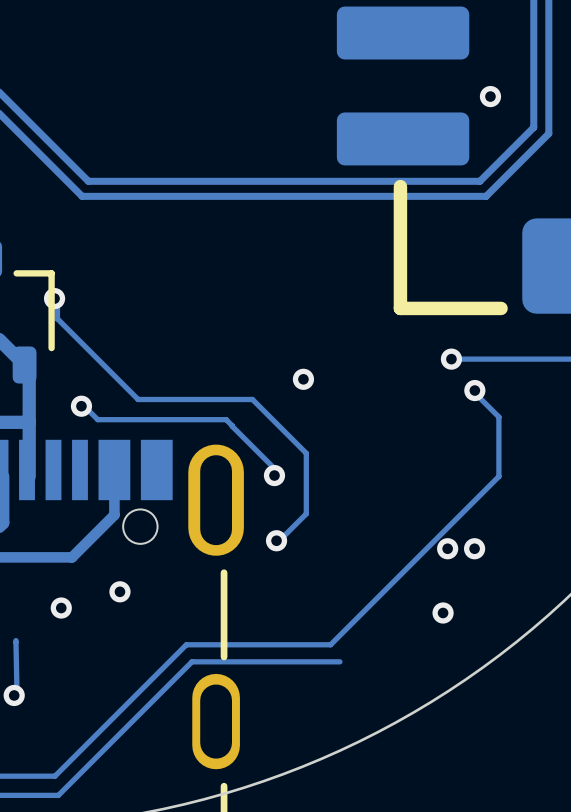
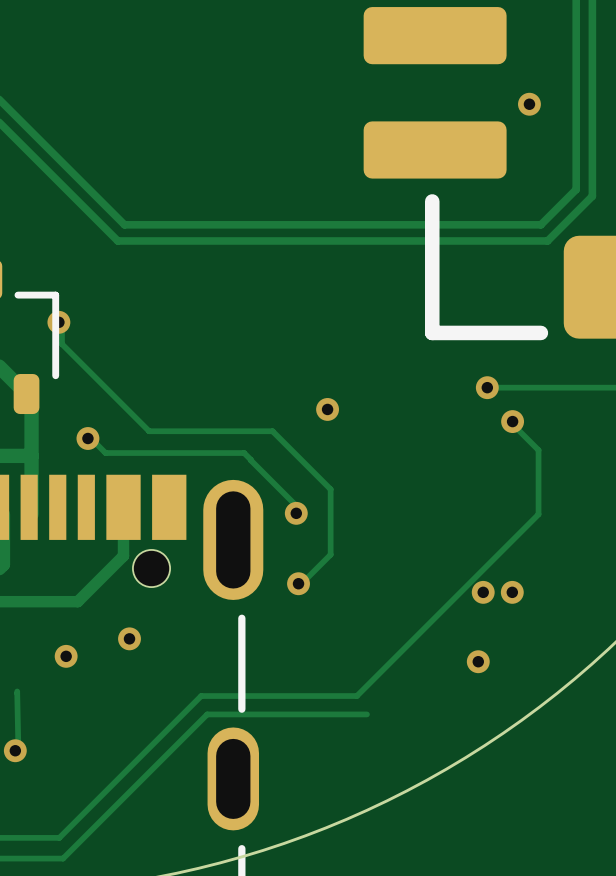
track: (533, 127) (479, 181) (88, 181) -> (576, 137) (576, 189) (540, 224) (124, 224) (95, 195)
track: (548, 133) (486, 196) (82, 196) -> (592, 144) (592, 196) (547, 240) (117, 240) (88, 211)

